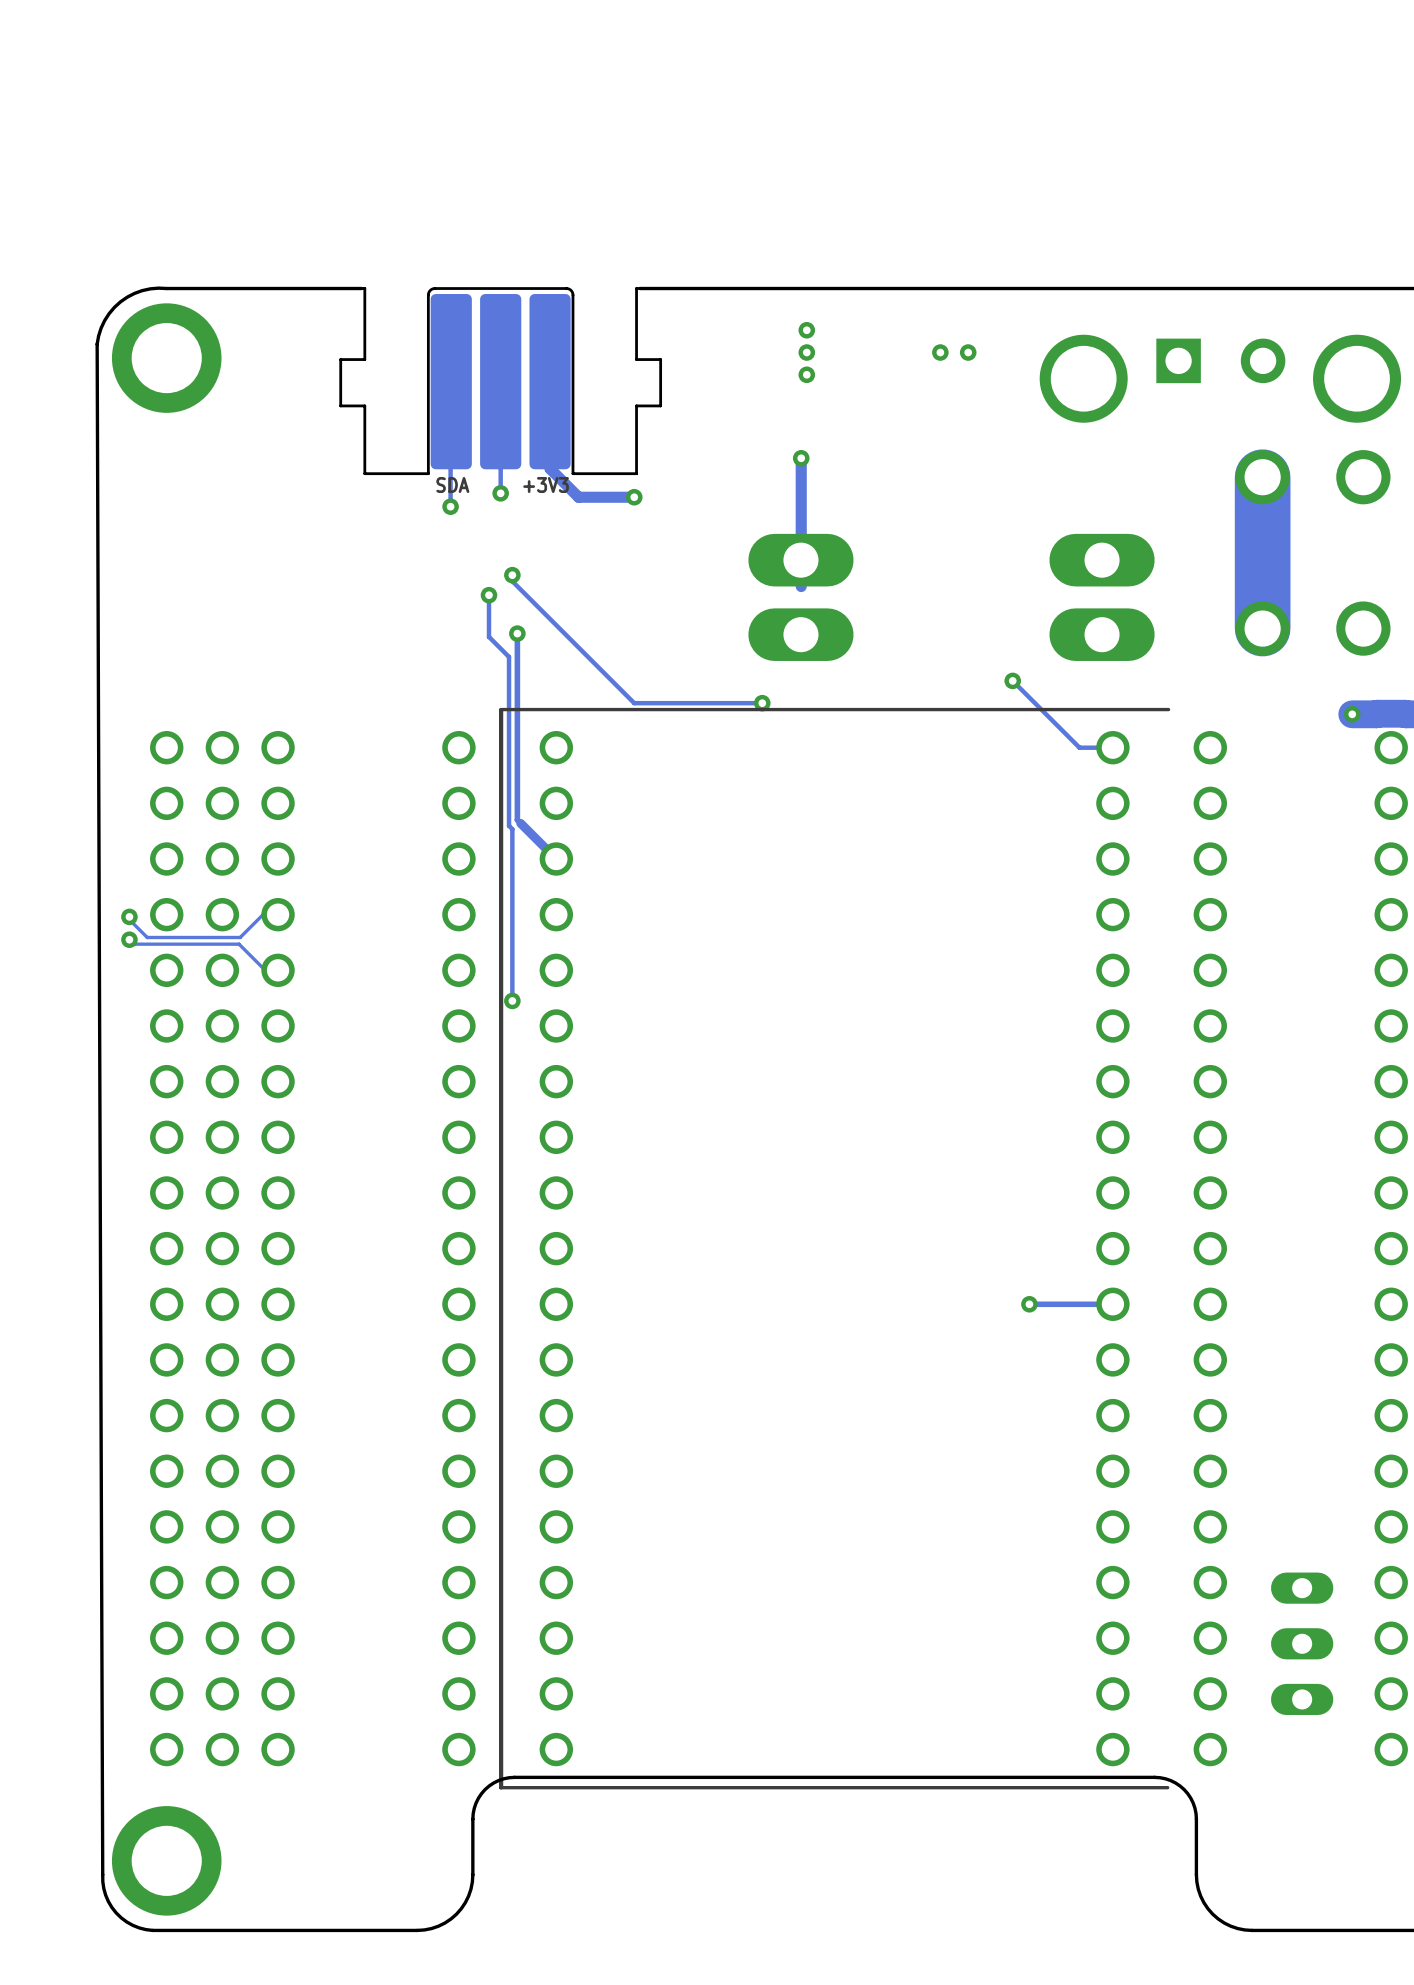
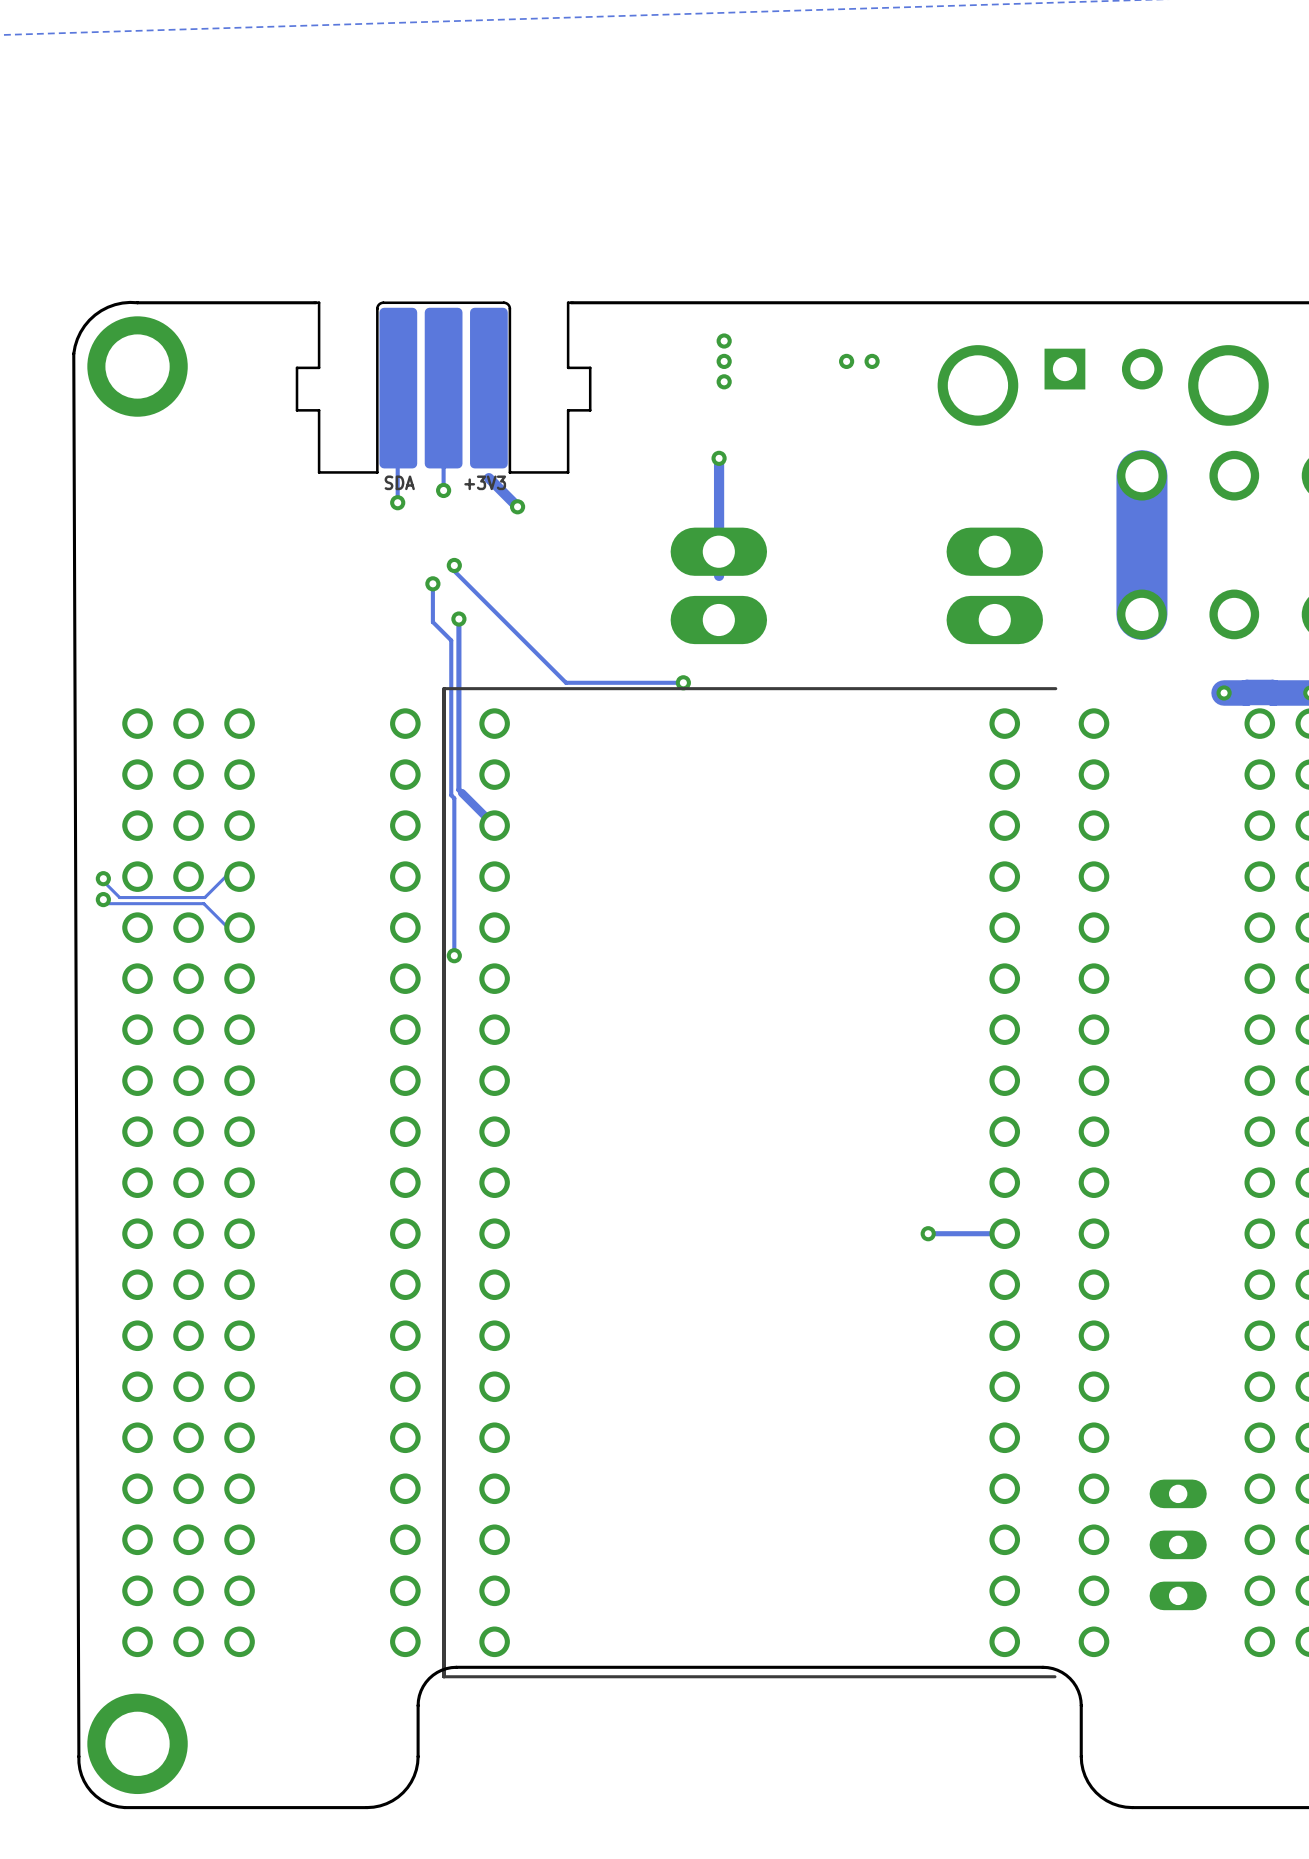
track: (550, 381) (550, 468) (578, 497) (634, 497) -> none
track: none -> (488, 478) (517, 506)
via position: (634, 497) -> (517, 506)
track: (1012, 680) (1079, 747) (1112, 747) -> none
via: (1012, 680) -> none

